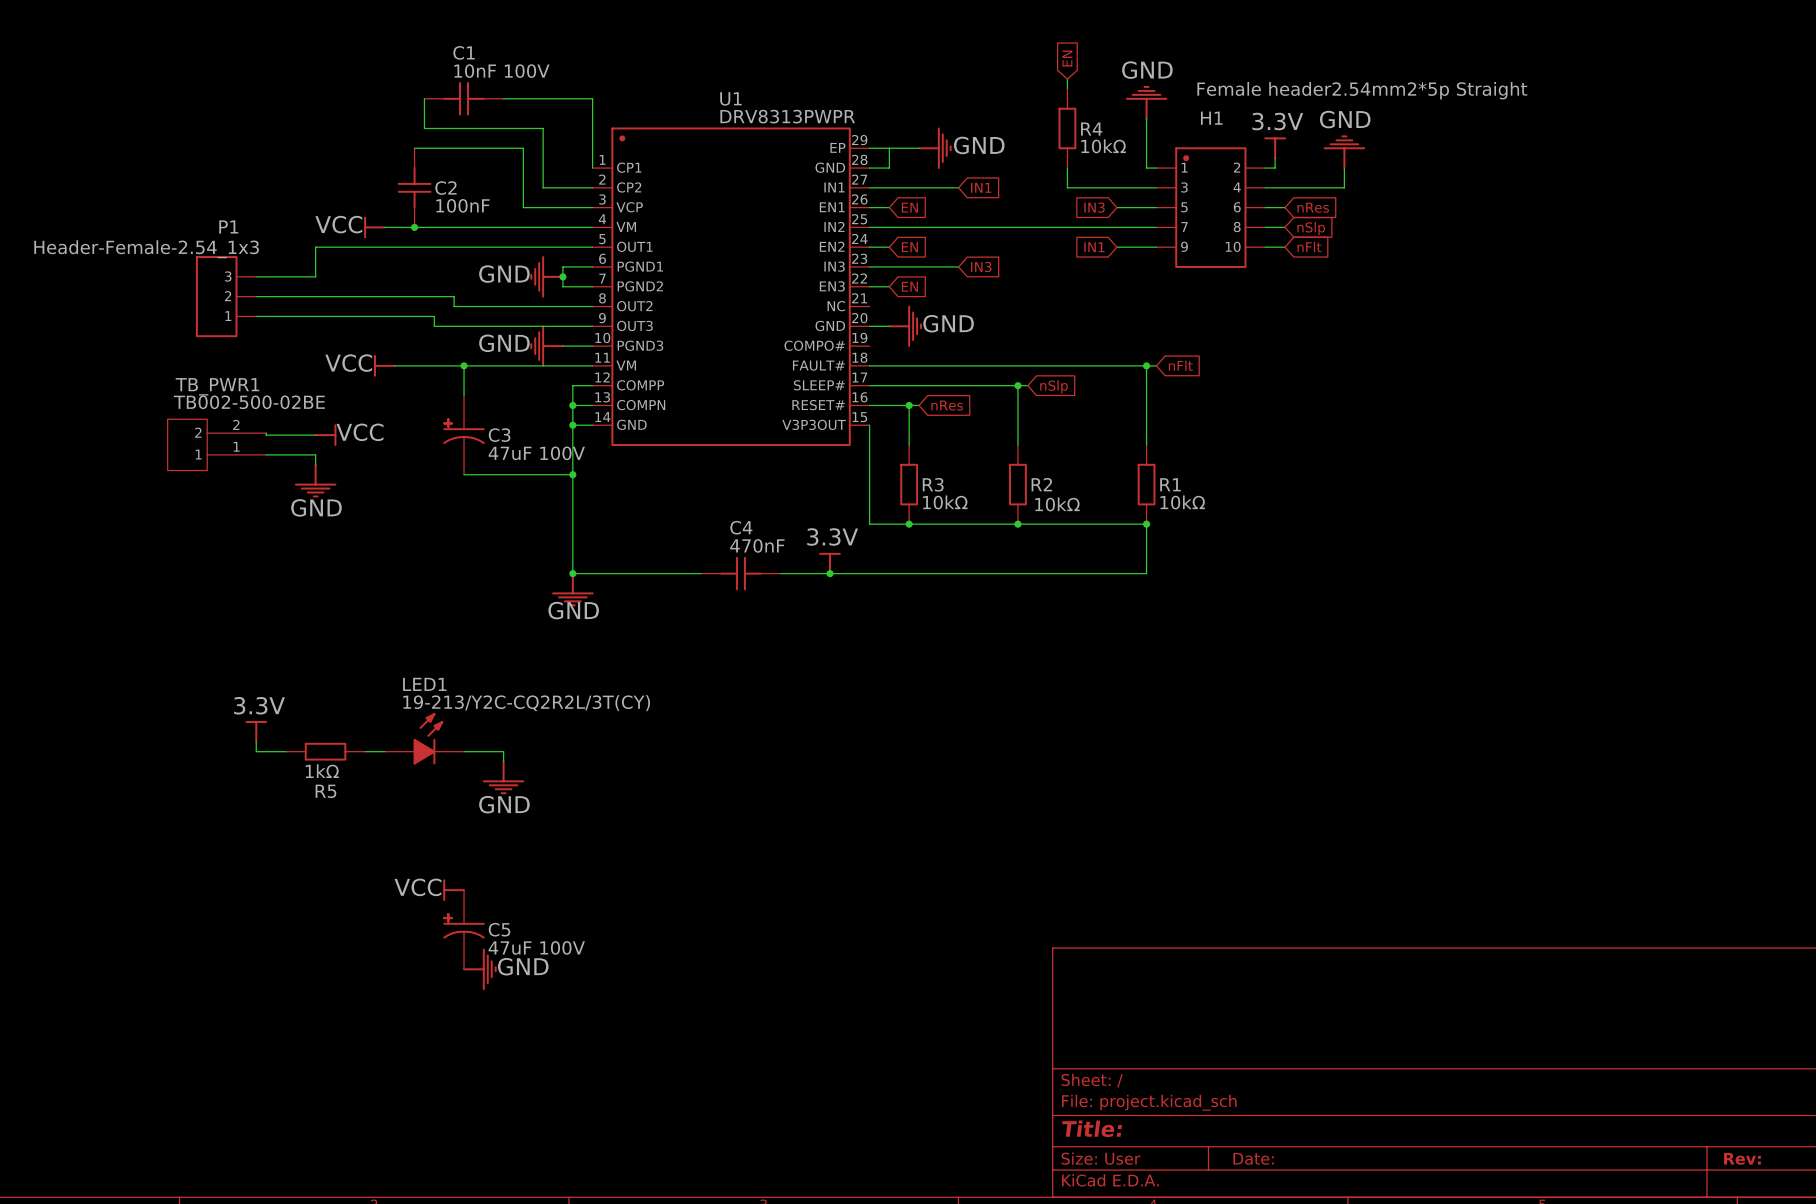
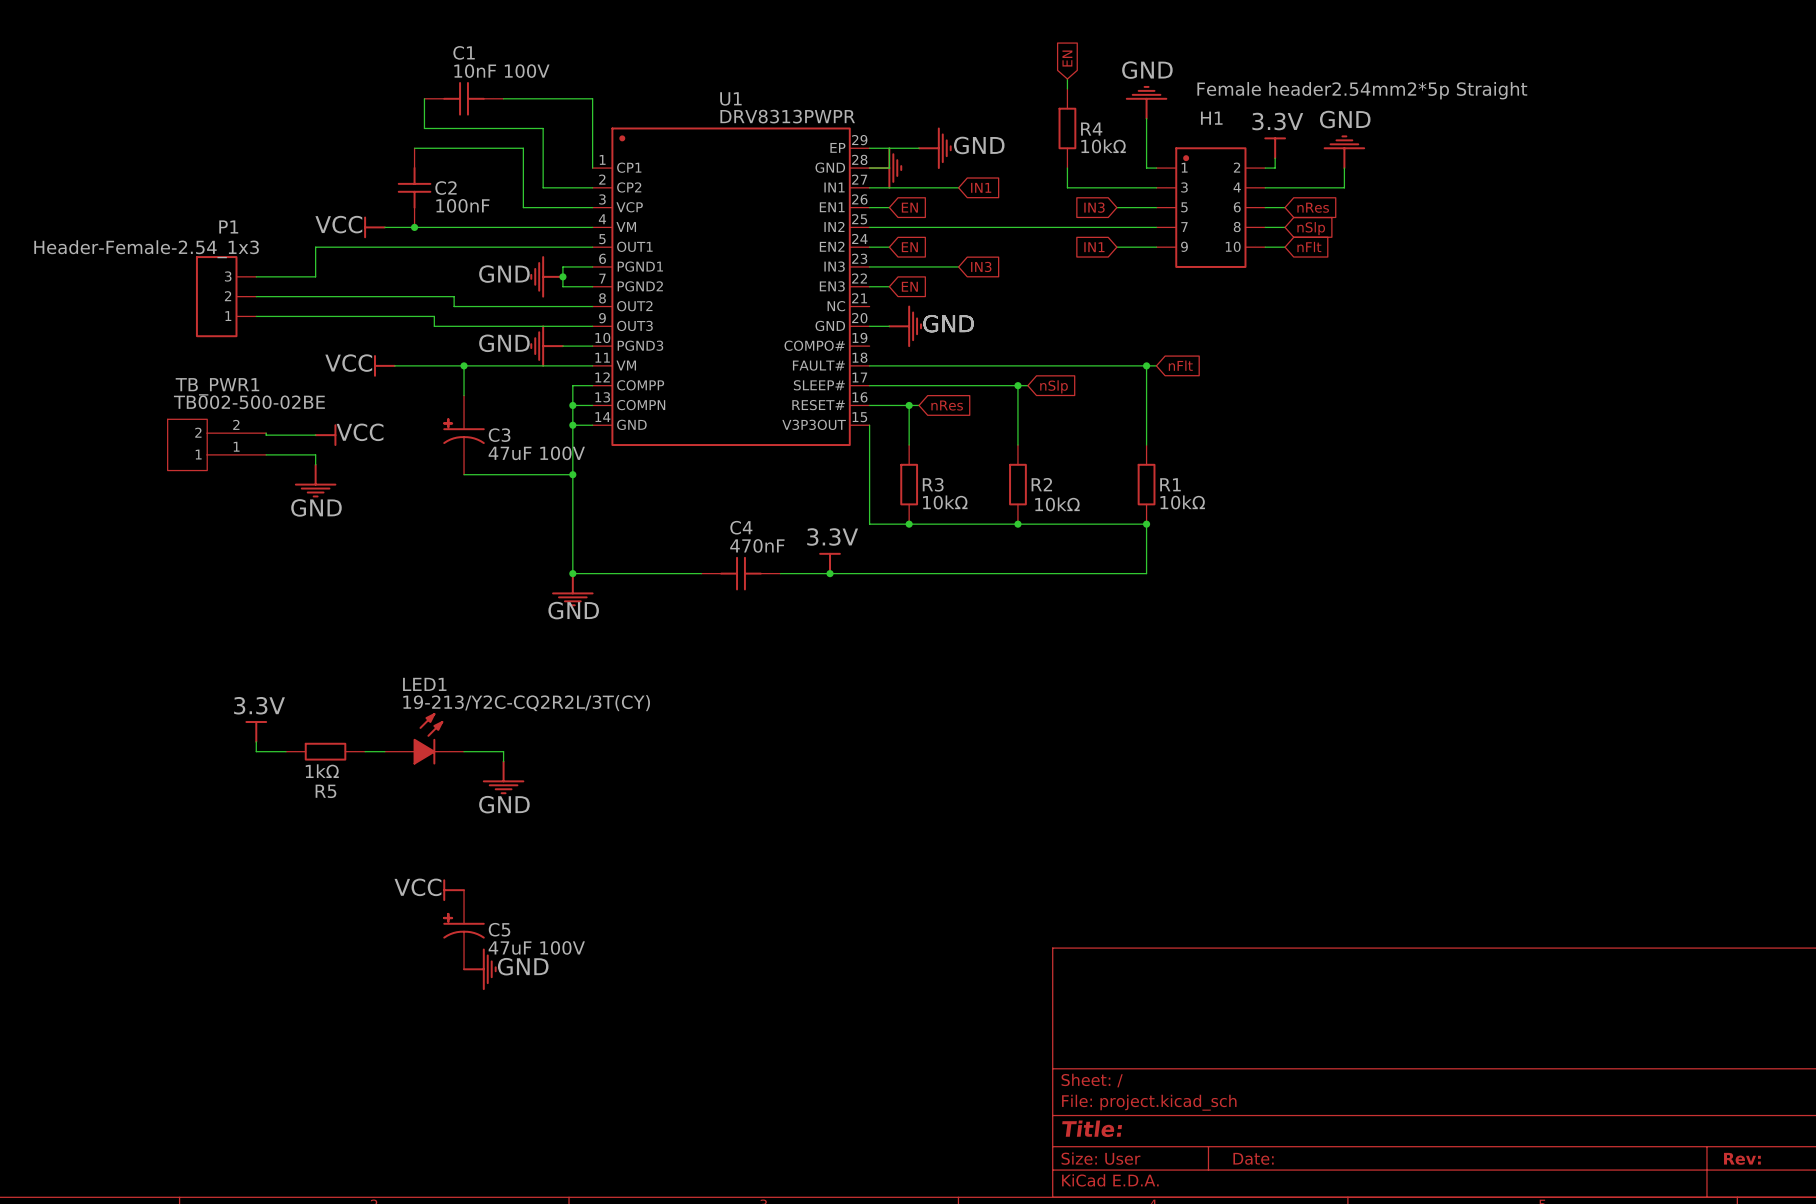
power symbol: none -> GND (885, 168)

